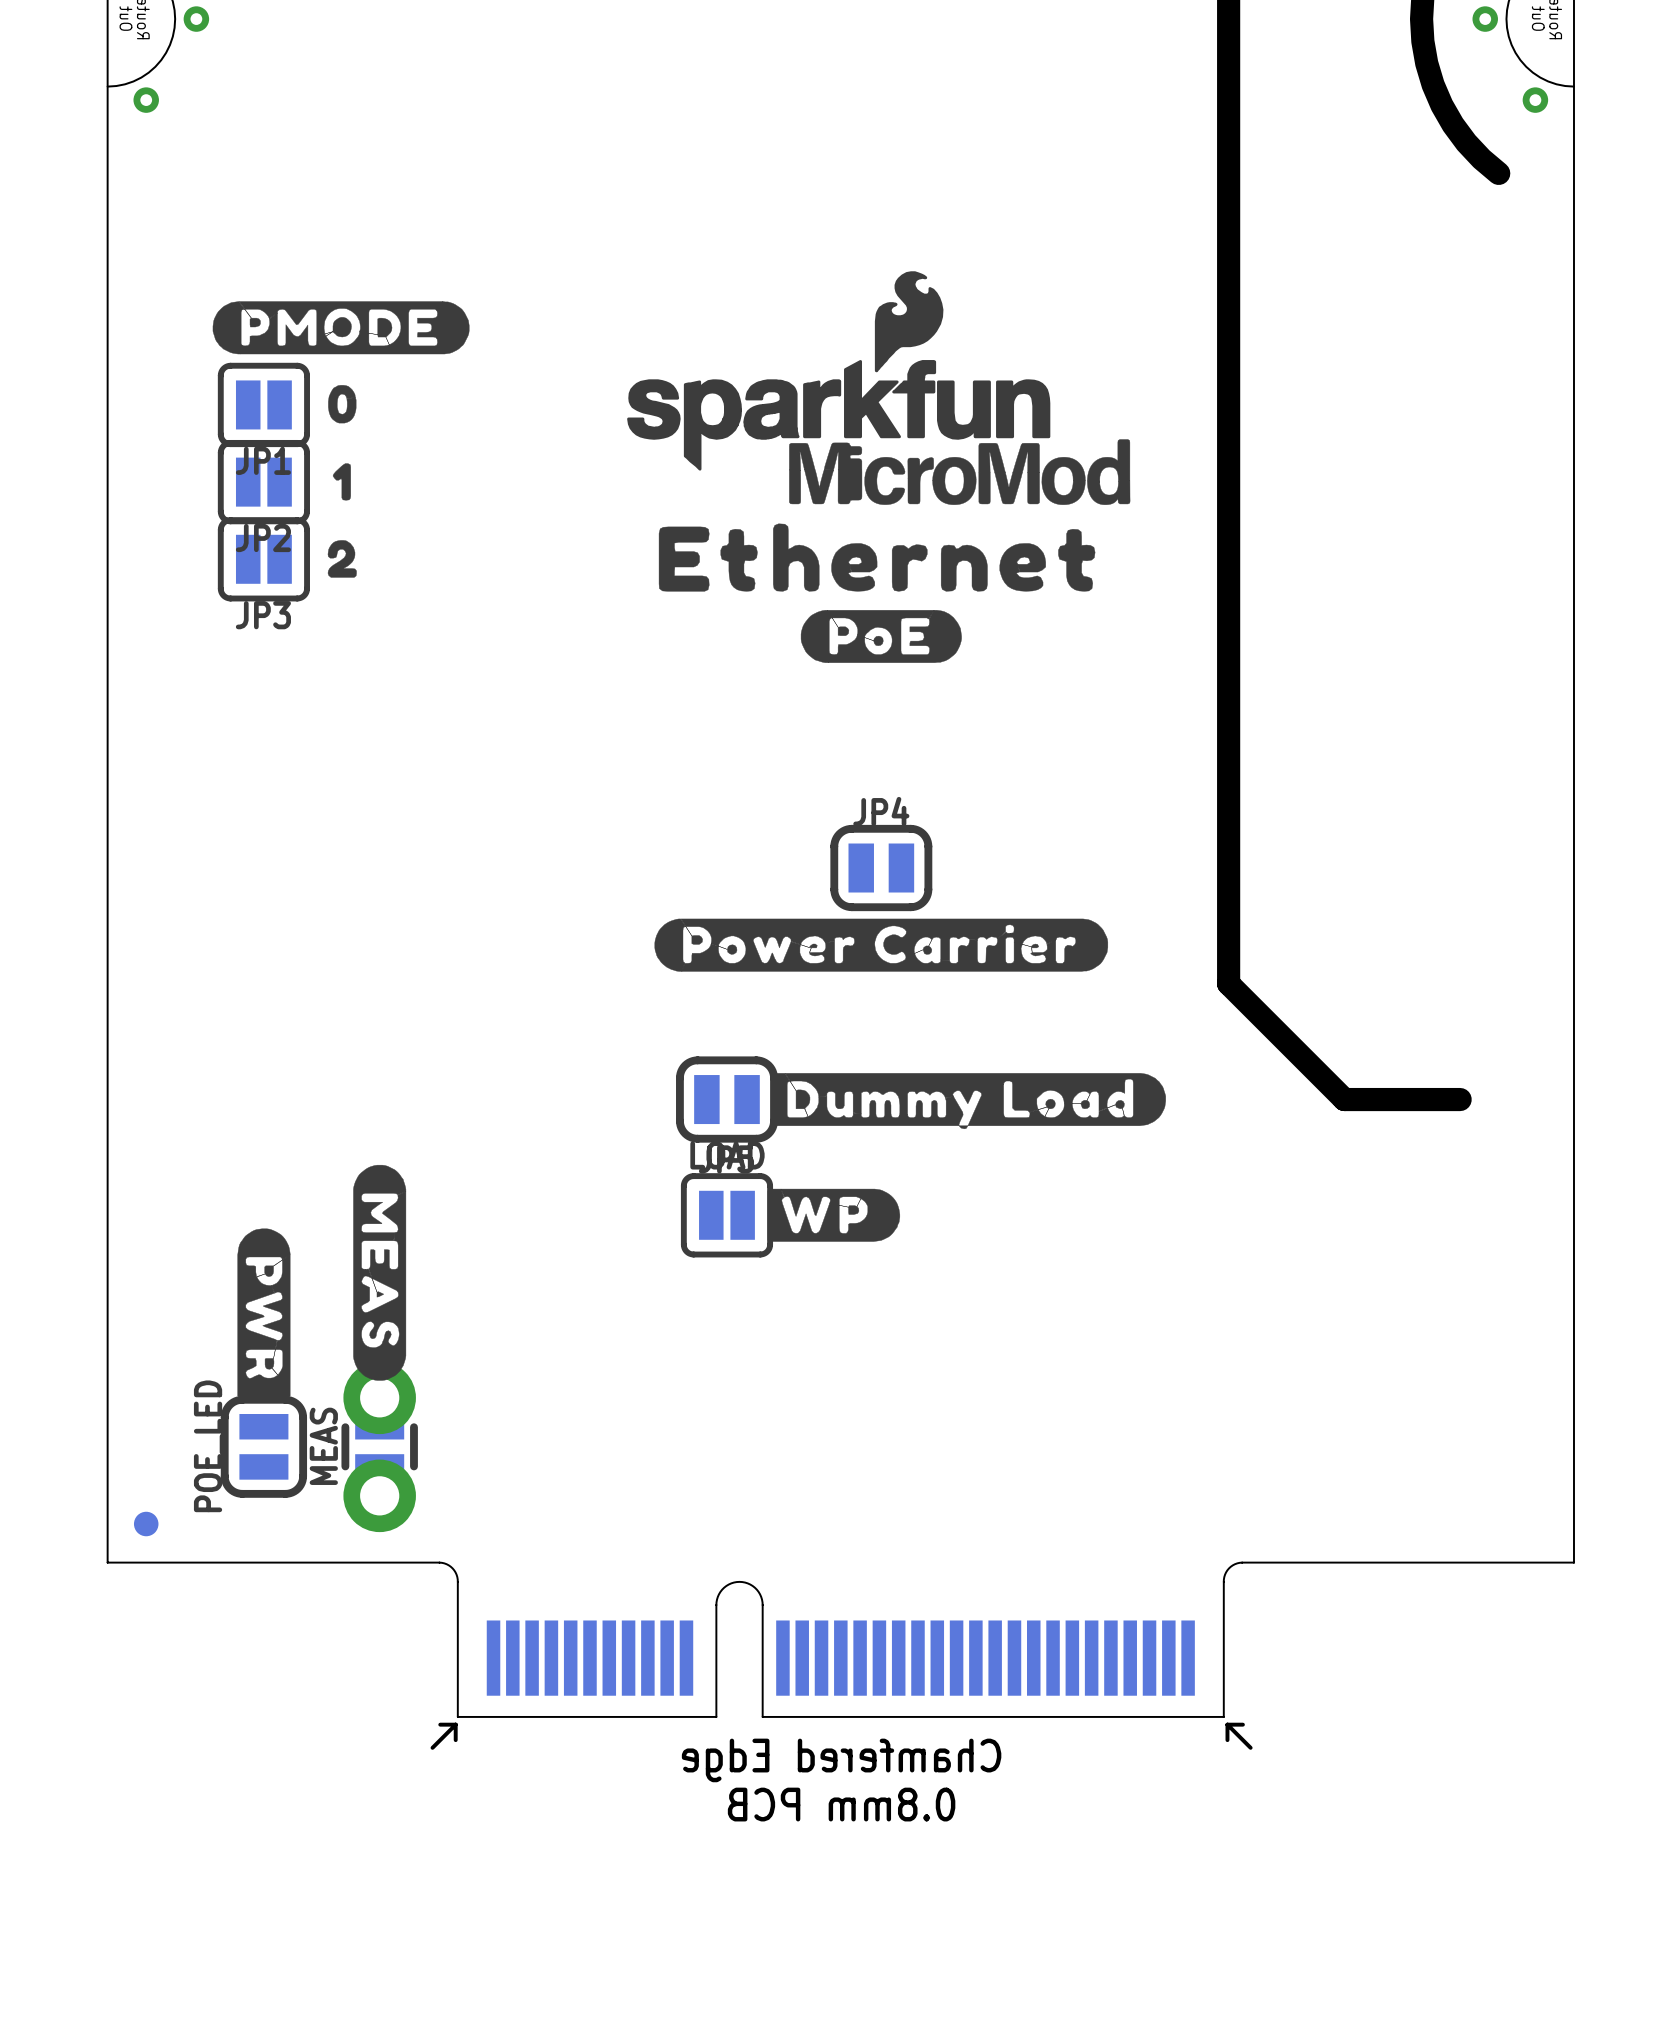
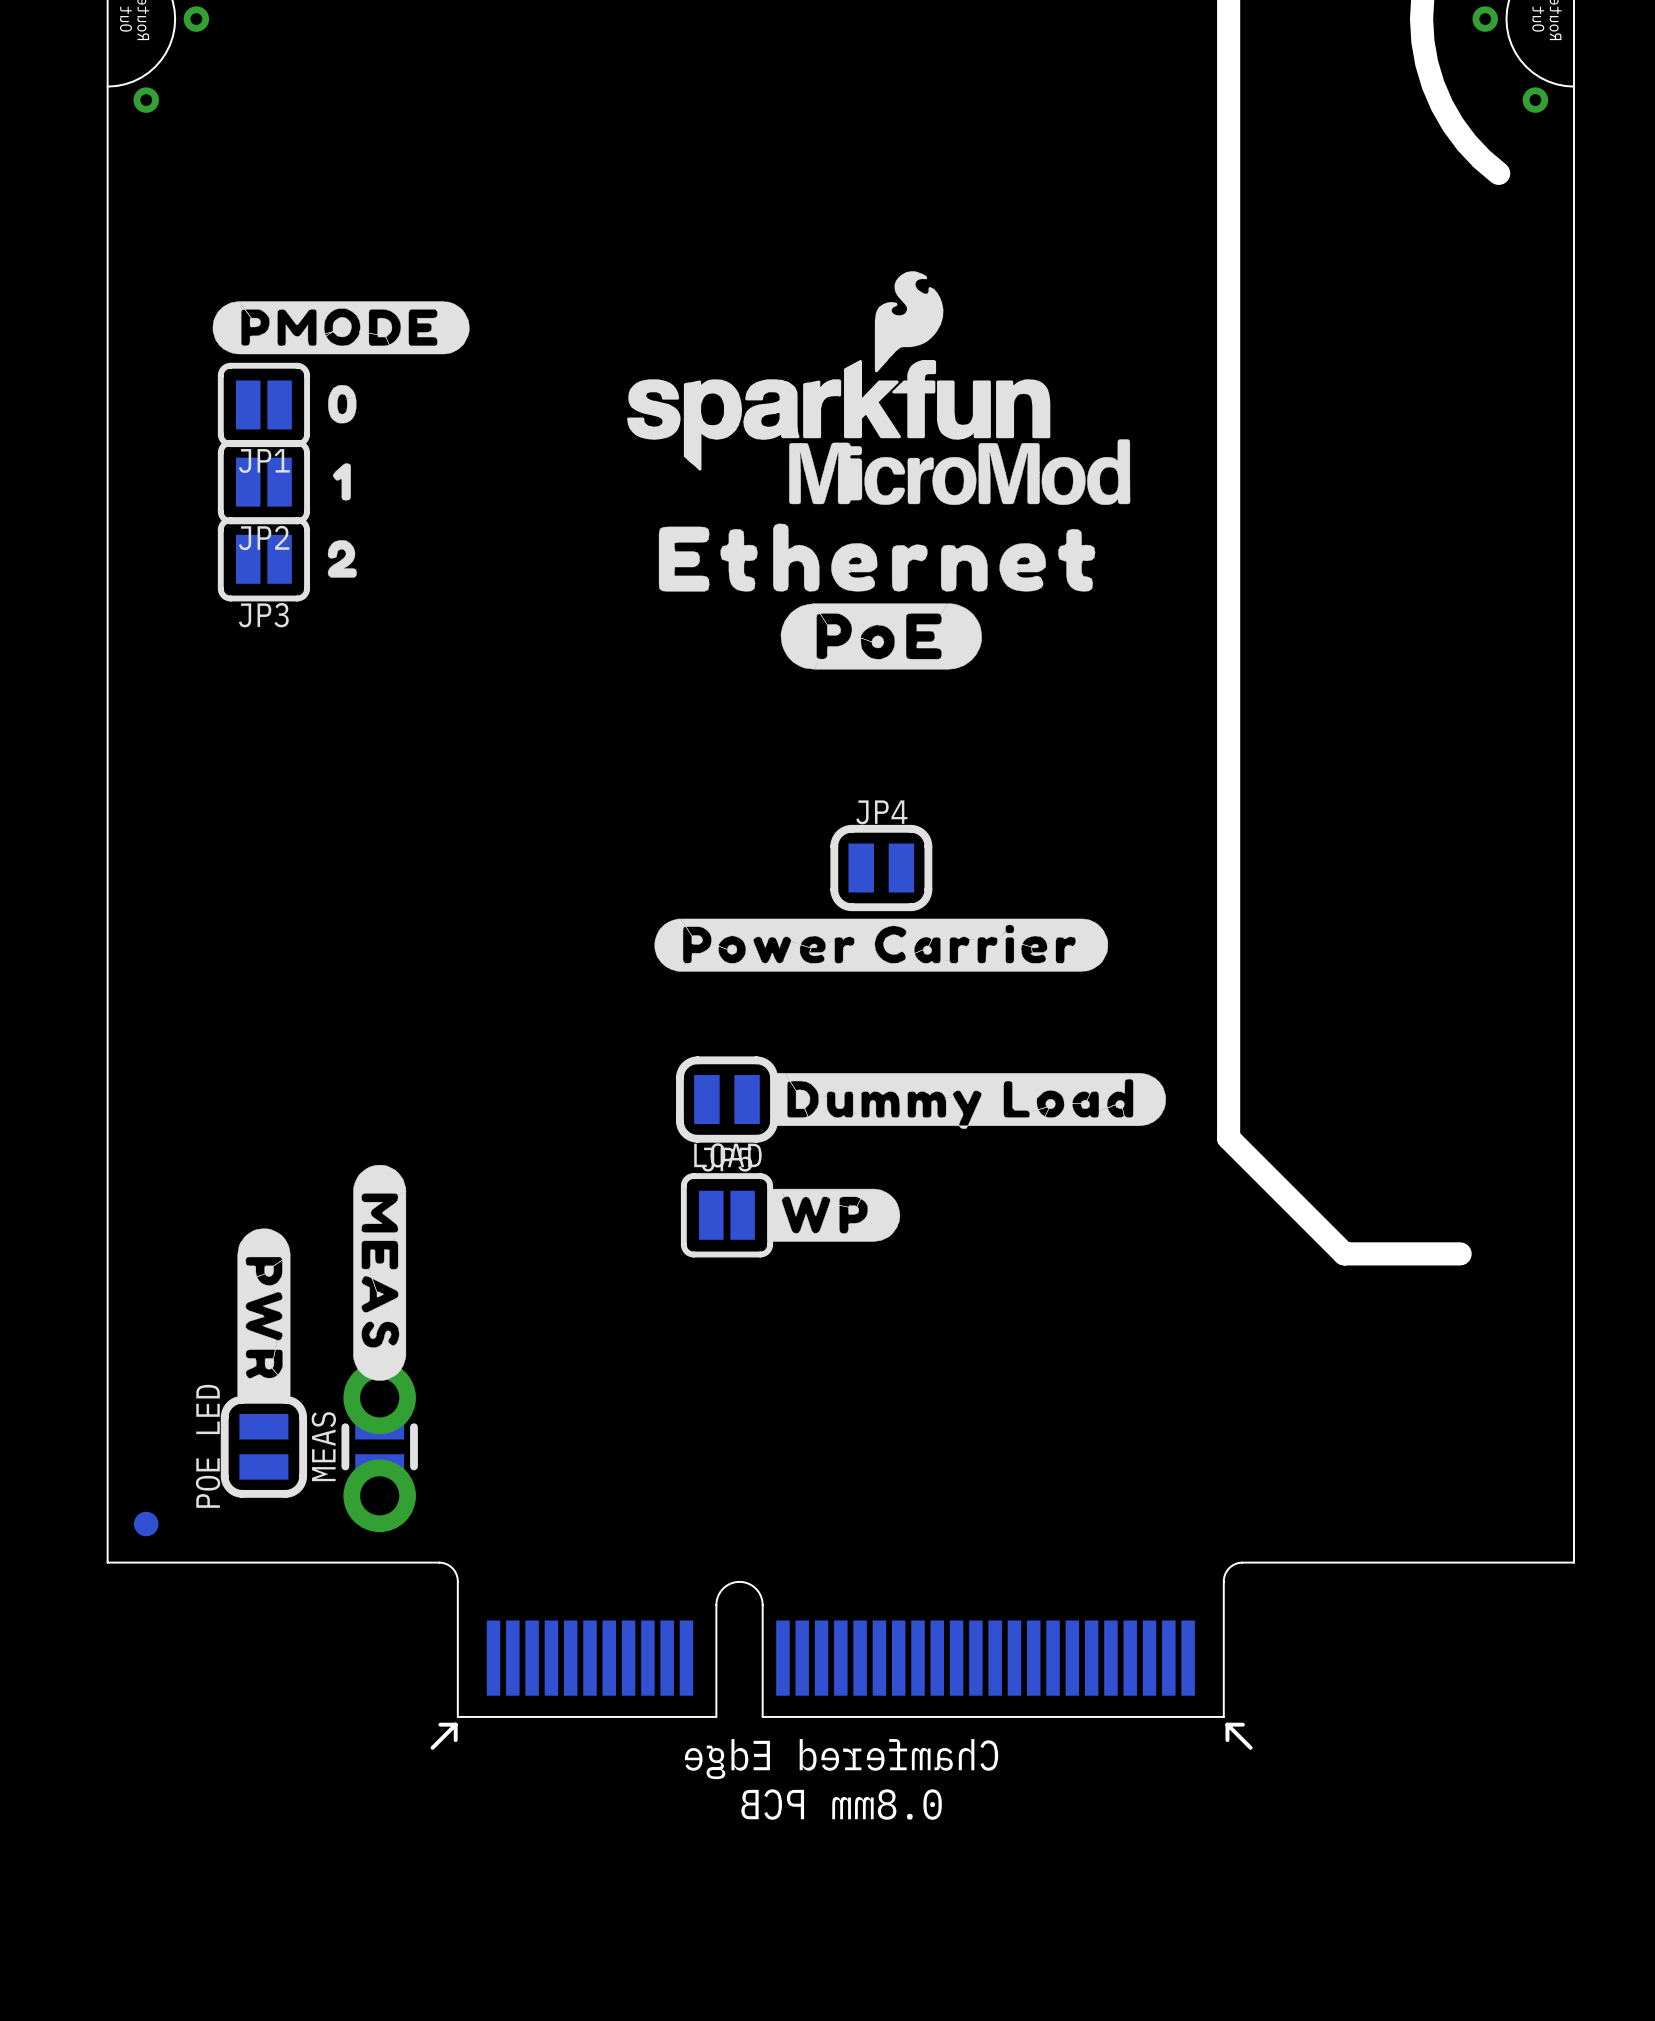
drawing shape: [800, 610, 962, 663] -> [780, 603, 982, 670]
board edge: (1228, 983) (1344, 1099) (1460, 1099) -> (1228, 983) (1228, 1138) (1344, 1253) (1460, 1253)

